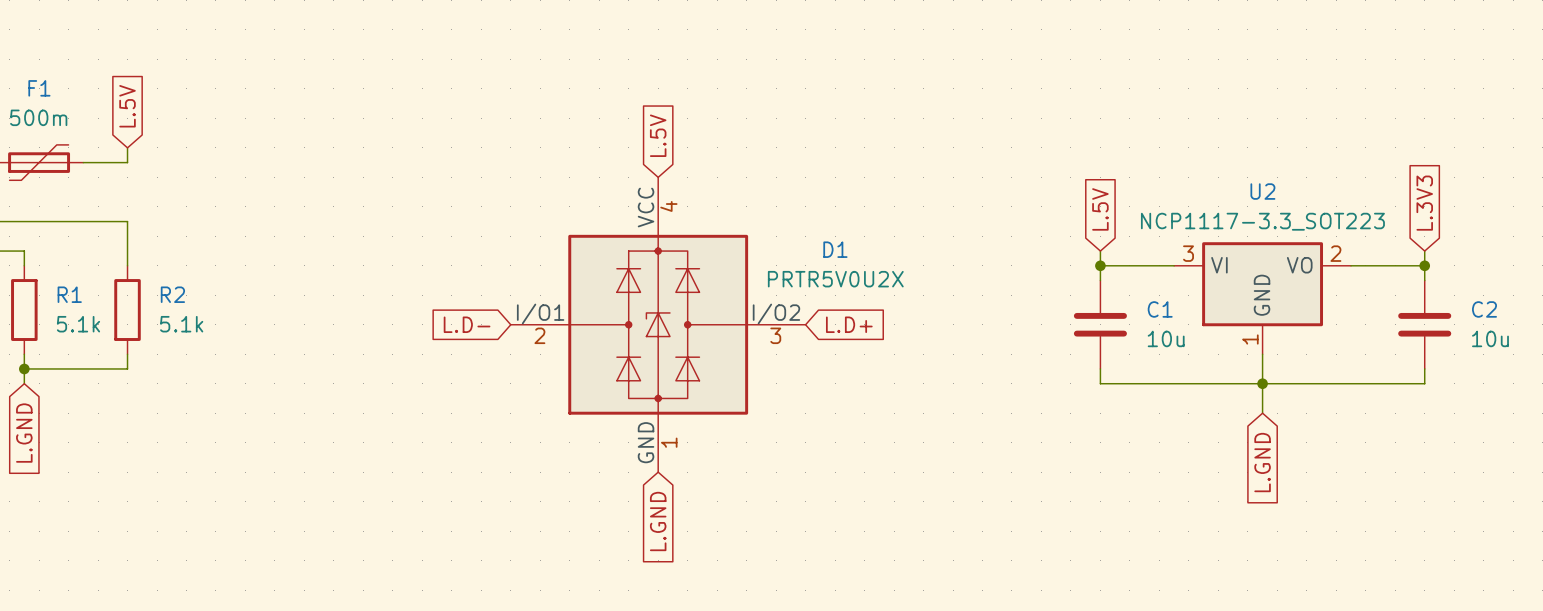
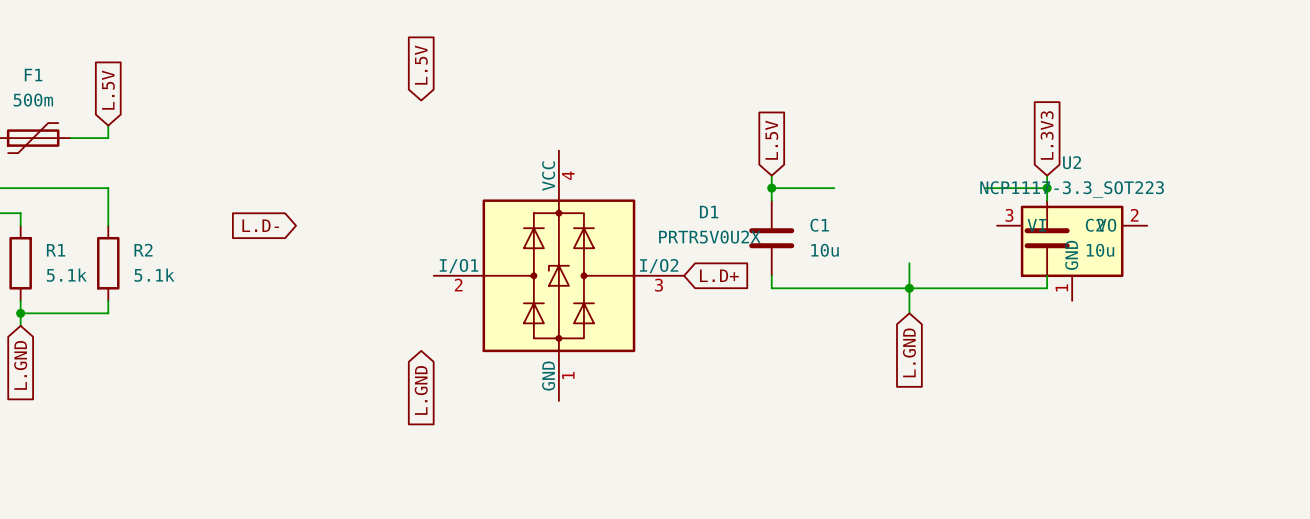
global label: none -> L.5V (421, 65)
global label: L.5V (658, 135) -> none
global label: none -> L.5V (771, 140)
global label position: L.3V3 (1424, 203) -> L.3V3 (1047, 135)
global label: L.5V (1100, 209) -> none
junction: none -> (771, 188)
junction: none -> (1047, 188)
wire: (1100, 251) (1100, 280) -> (771, 175) (771, 200)
wire: (1424, 251) (1424, 280) -> (1047, 175) (1047, 200)
wire: (1100, 265) (1174, 265) -> (771, 188) (834, 188)
junction: (1100, 265) -> none
wire: (1351, 265) (1424, 265) -> (984, 188) (1047, 188)
junction: (1424, 265) -> none
global label position: L.D- (467, 324) -> L.D- (260, 225)
C1 position: (1100, 324) -> (771, 238)
C2 position: (1424, 324) -> (1047, 238)
junction: none -> (909, 288)
wire: (1262, 354) (1262, 413) -> (909, 263) (909, 313)
wire: (1100, 368) (1100, 383) (1424, 383) (1424, 368) -> (771, 275) (771, 288) (1047, 288) (1047, 275)
junction: (1262, 383) -> none
global label position: L.GND (1262, 462) -> L.GND (909, 352)
global label position: L.GND (658, 521) -> L.GND (421, 390)

